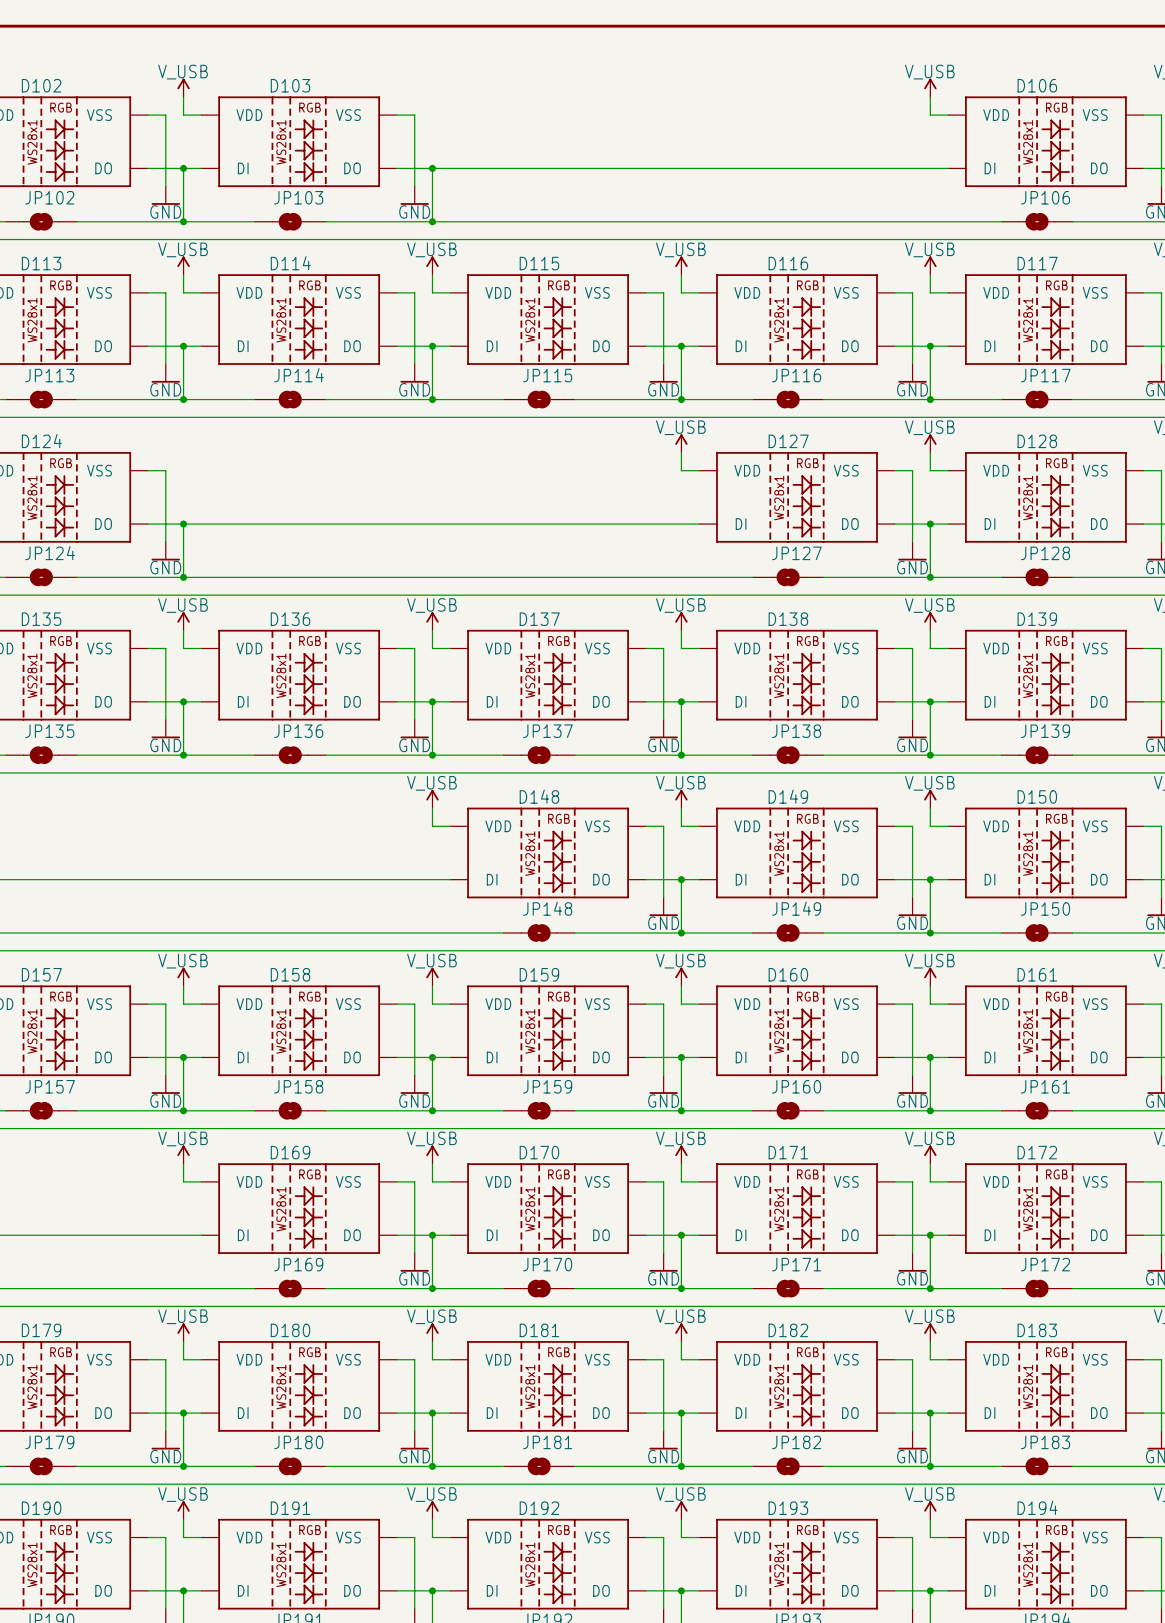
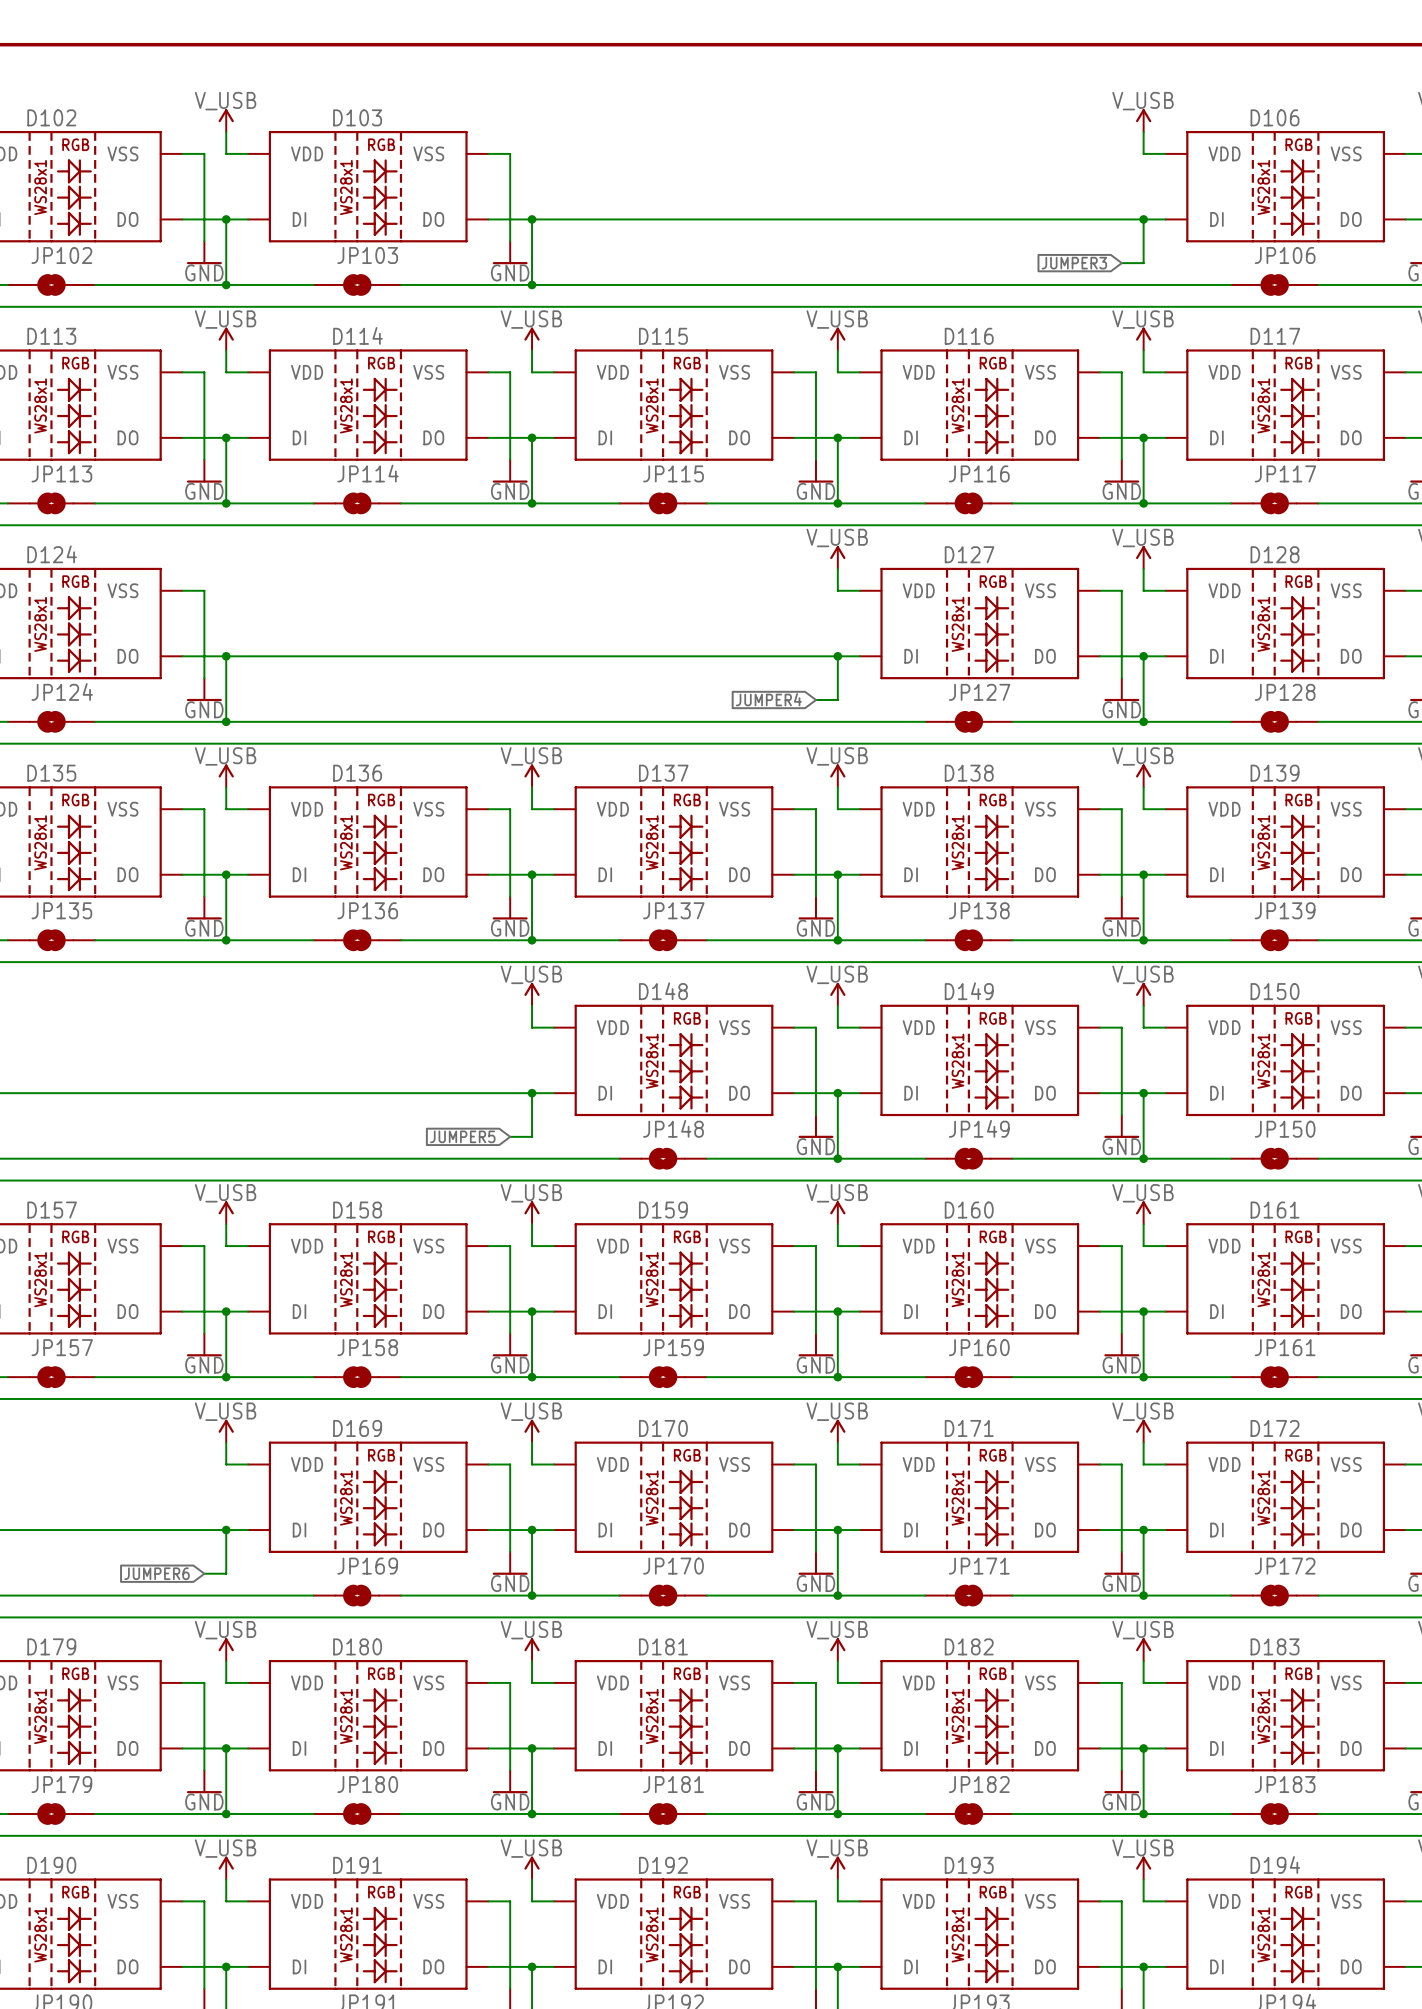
wire: none -> (1143, 219) (1143, 263) (1121, 263)
junction: none -> (1143, 219)
global label: none -> JUMPER3 (1074, 263)
wire: none -> (837, 656) (837, 699) (815, 699)
junction: none -> (837, 656)
global label: none -> JUMPER4 (768, 699)
wire: none -> (532, 1093) (532, 1136) (510, 1136)
junction: none -> (532, 1093)
global label: none -> JUMPER5 (462, 1136)
wire: none -> (226, 1530) (226, 1573) (204, 1573)
junction: none -> (226, 1530)
global label: none -> JUMPER6 (156, 1573)

